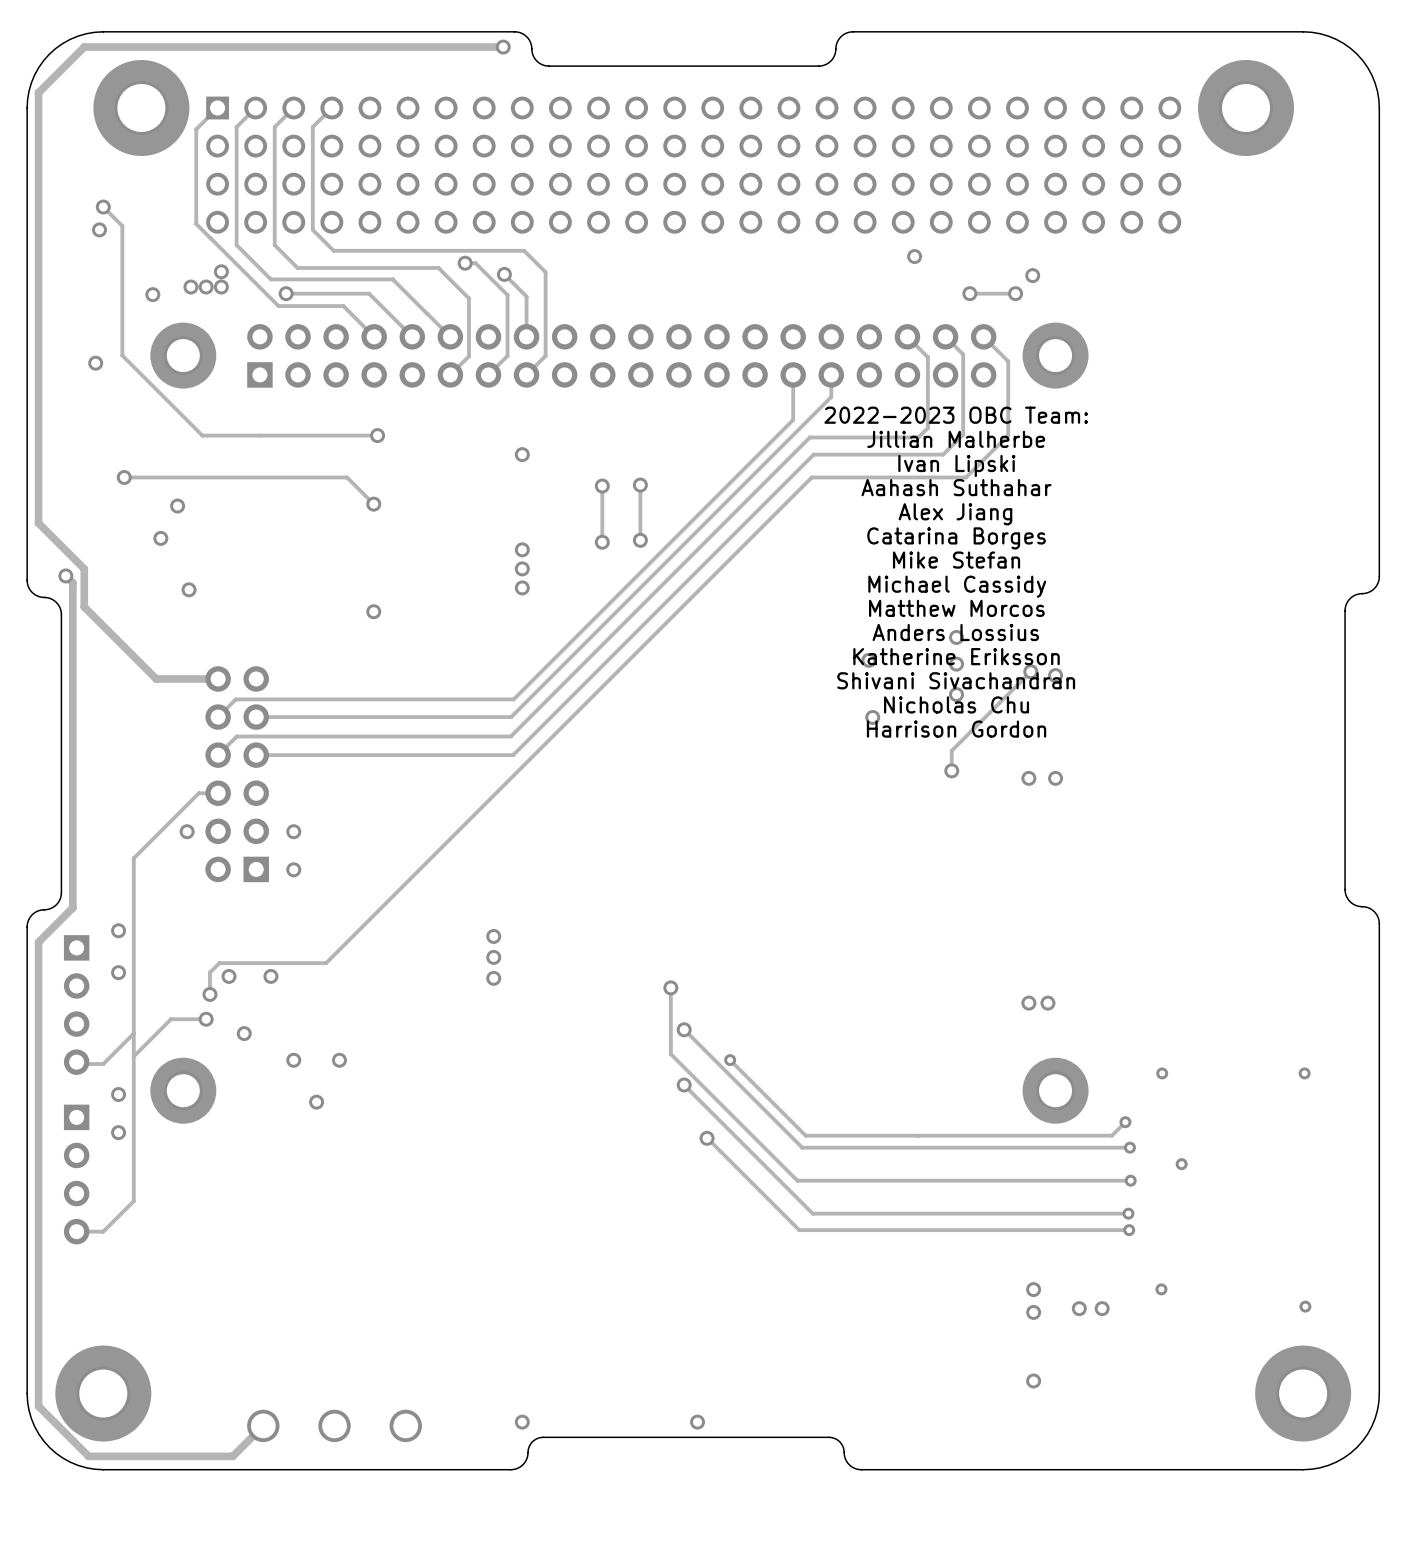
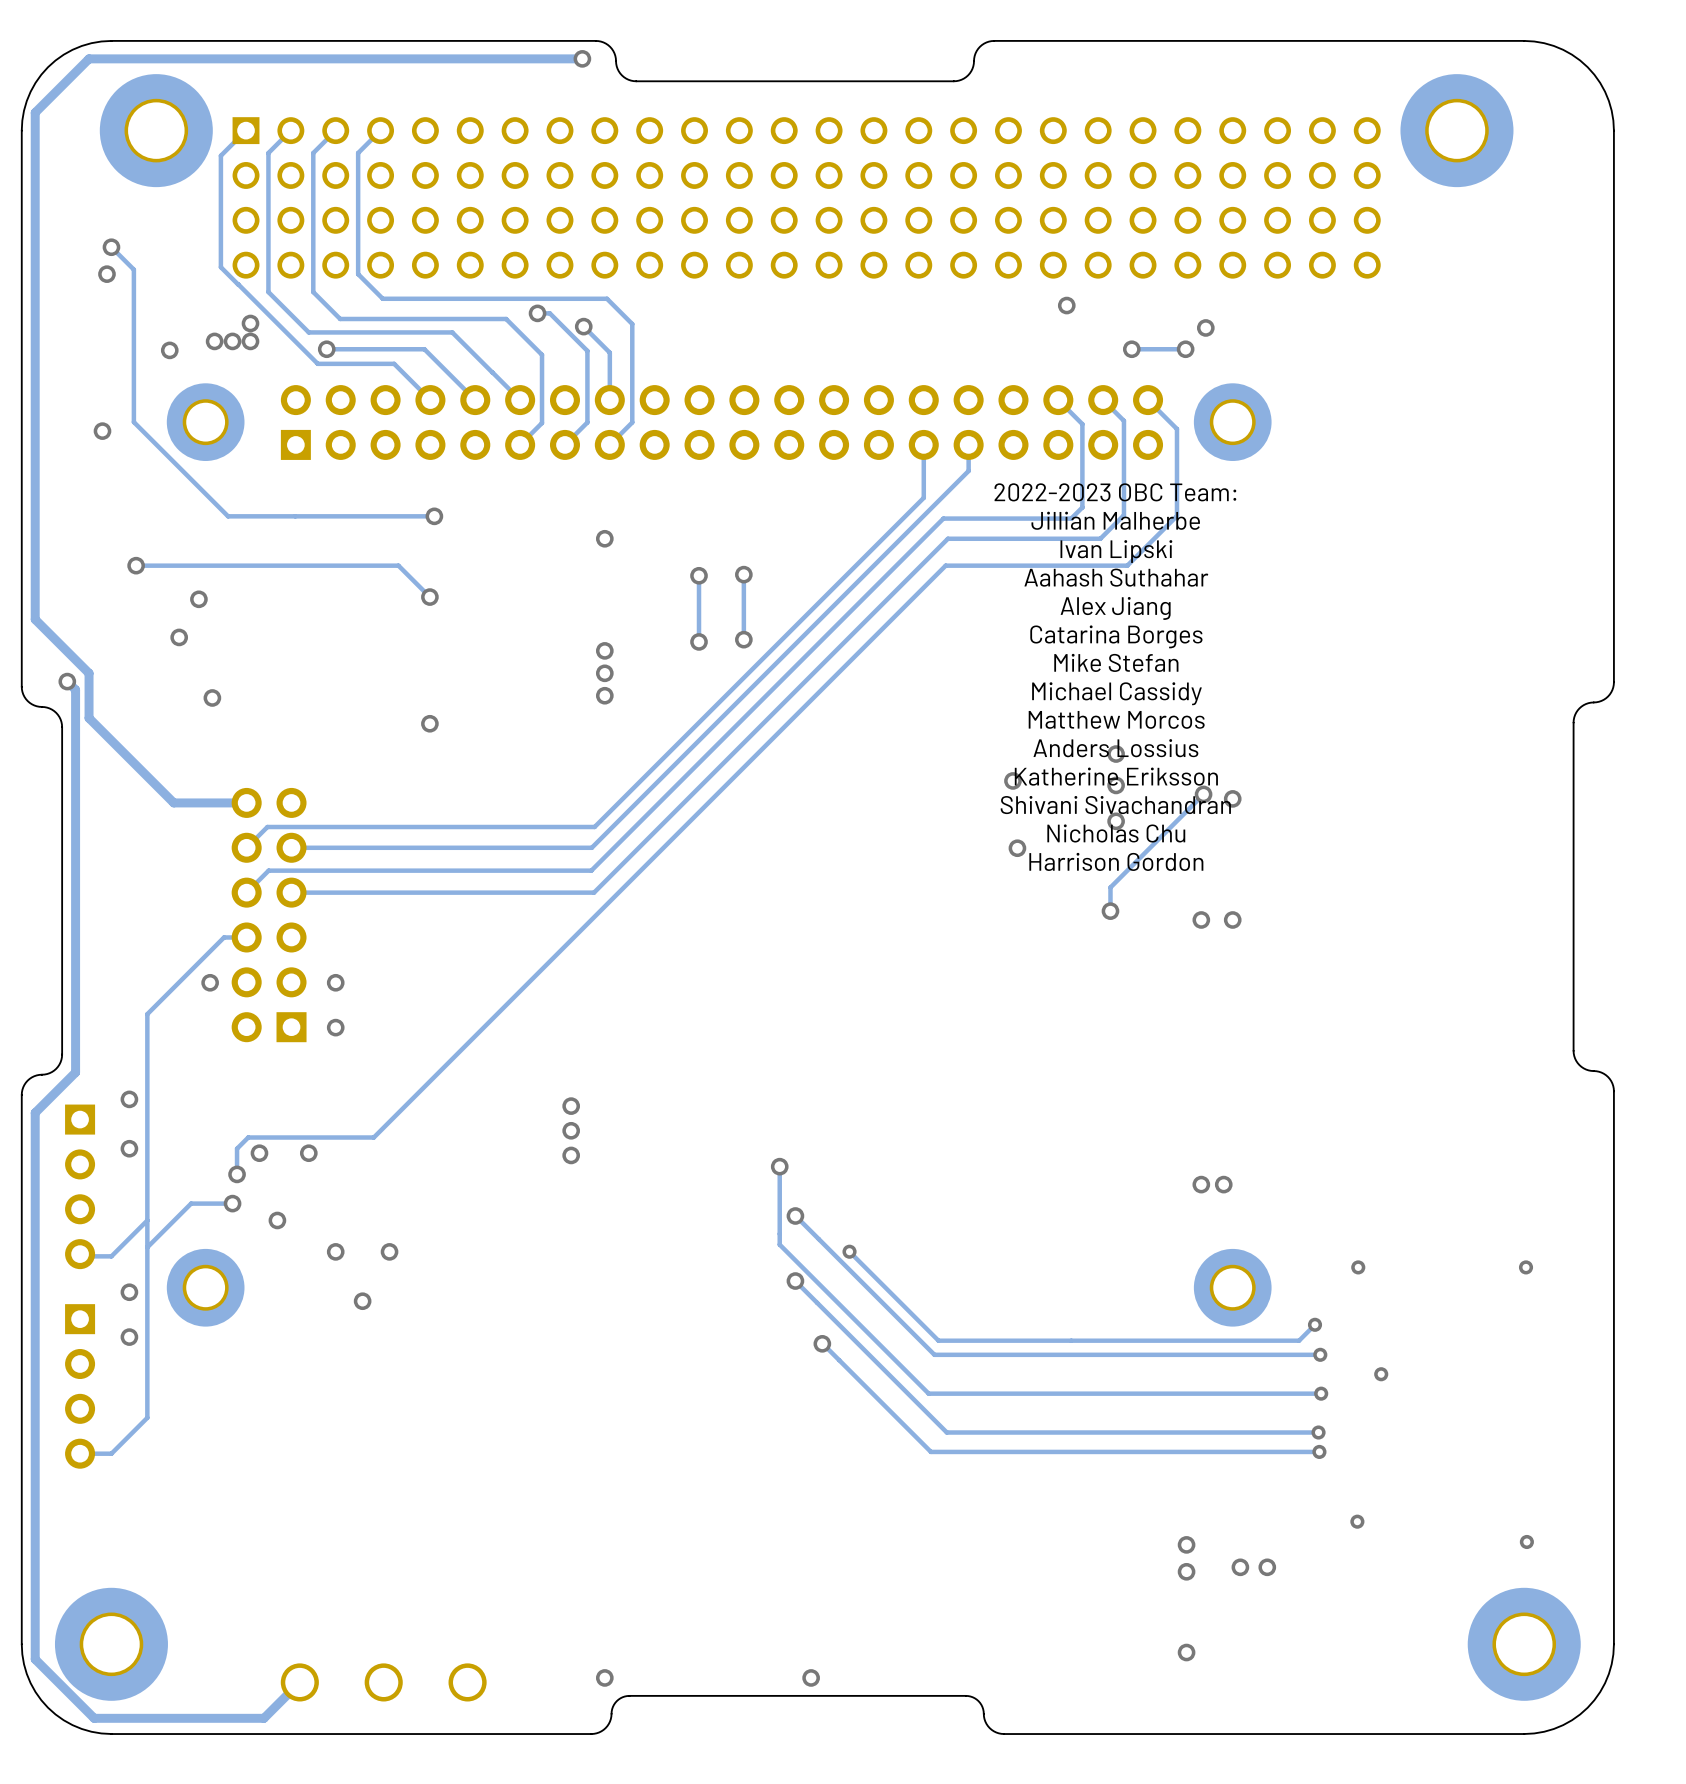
via: (1033, 1289) -> none
via: (1079, 1308) -> none
via: (1102, 1308) -> none
via: none -> (1186, 1544)
via: (1033, 1312) -> none
via: none -> (1240, 1567)
via: none -> (1267, 1567)
via: none -> (1186, 1571)
via: (1033, 1381) -> none
via: none -> (1186, 1652)

